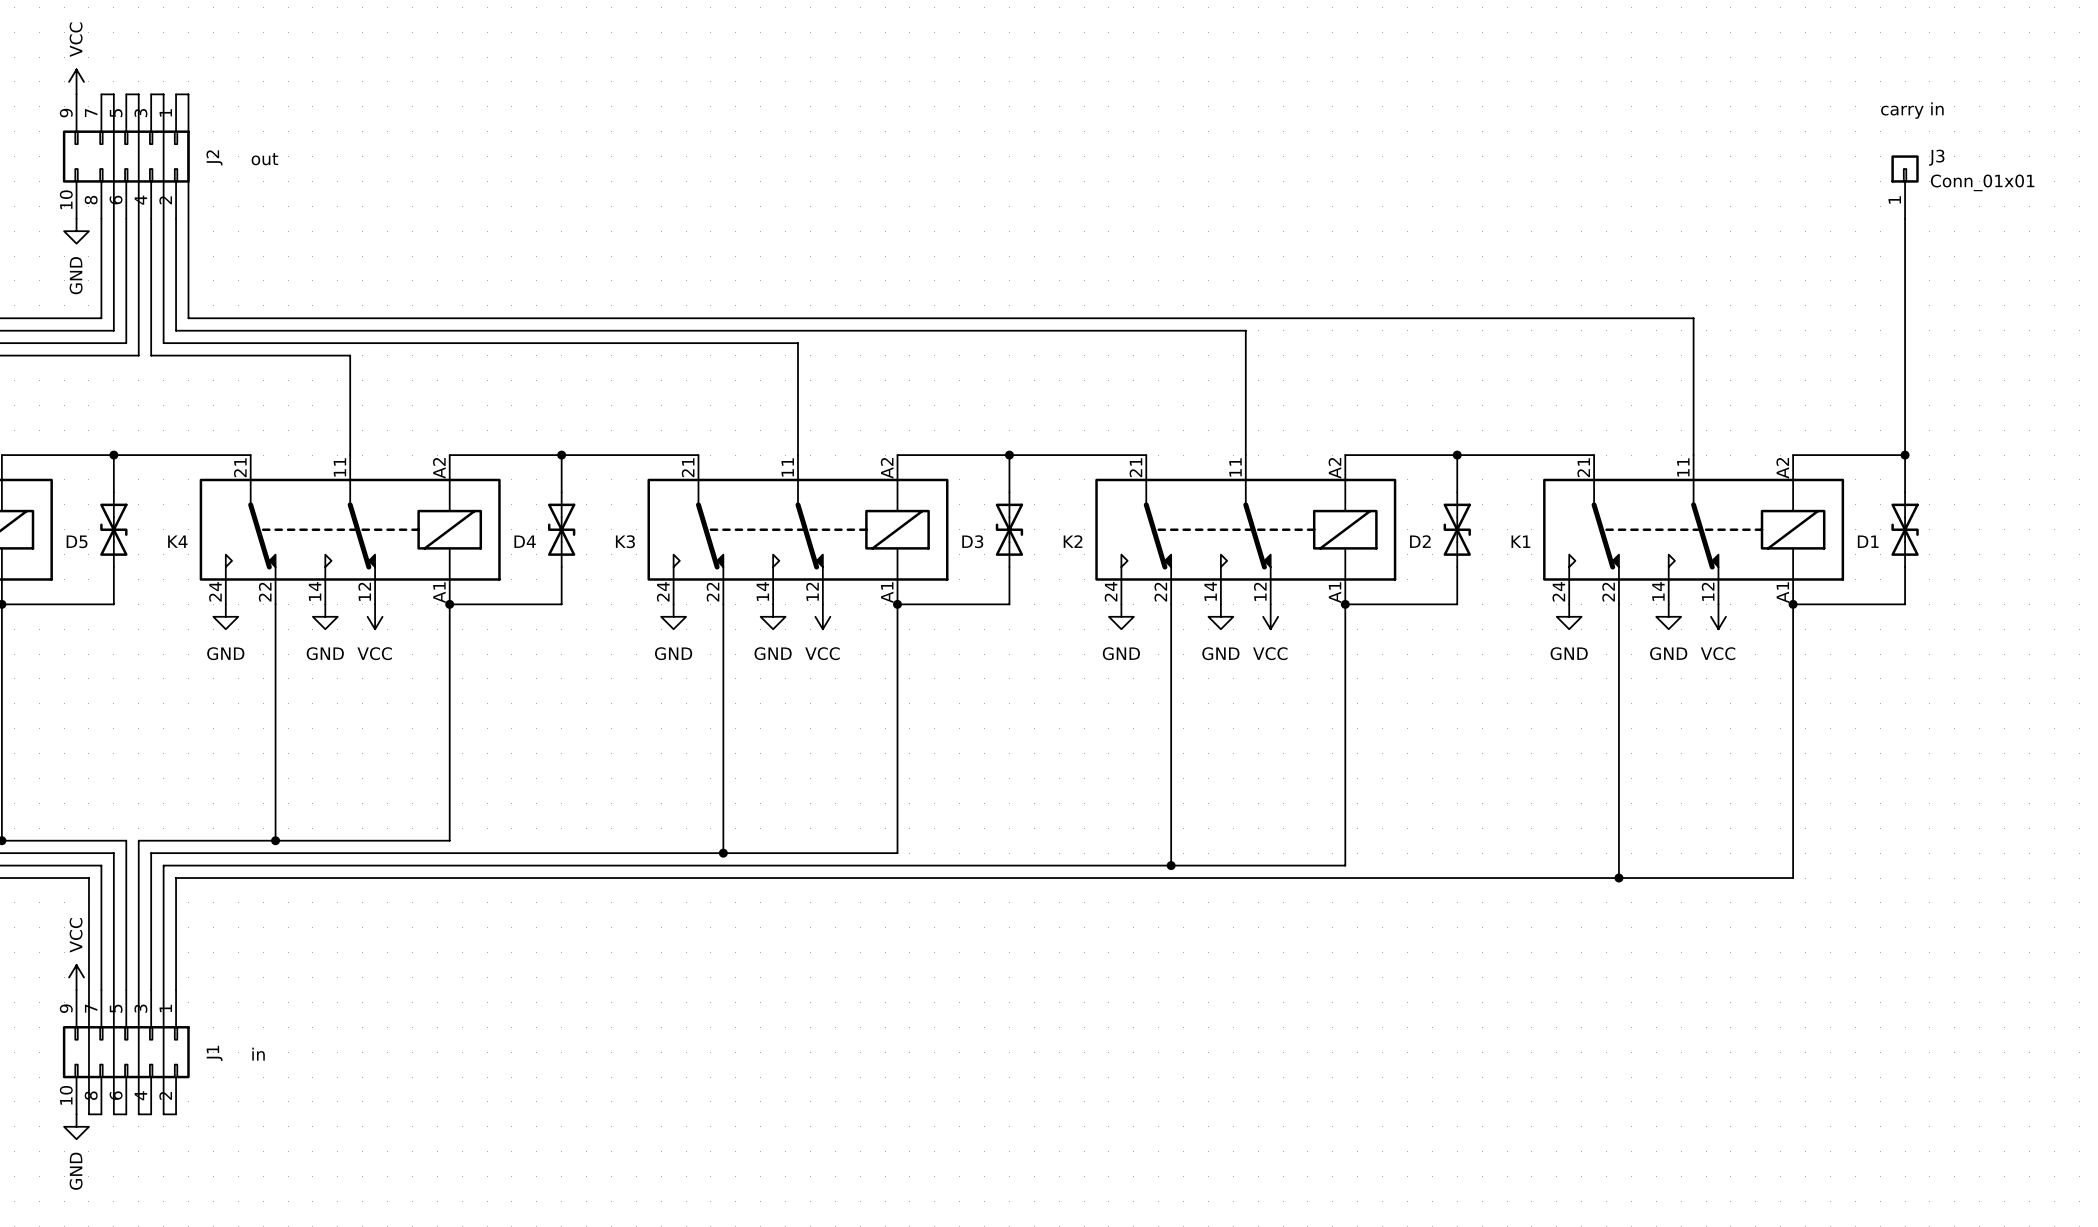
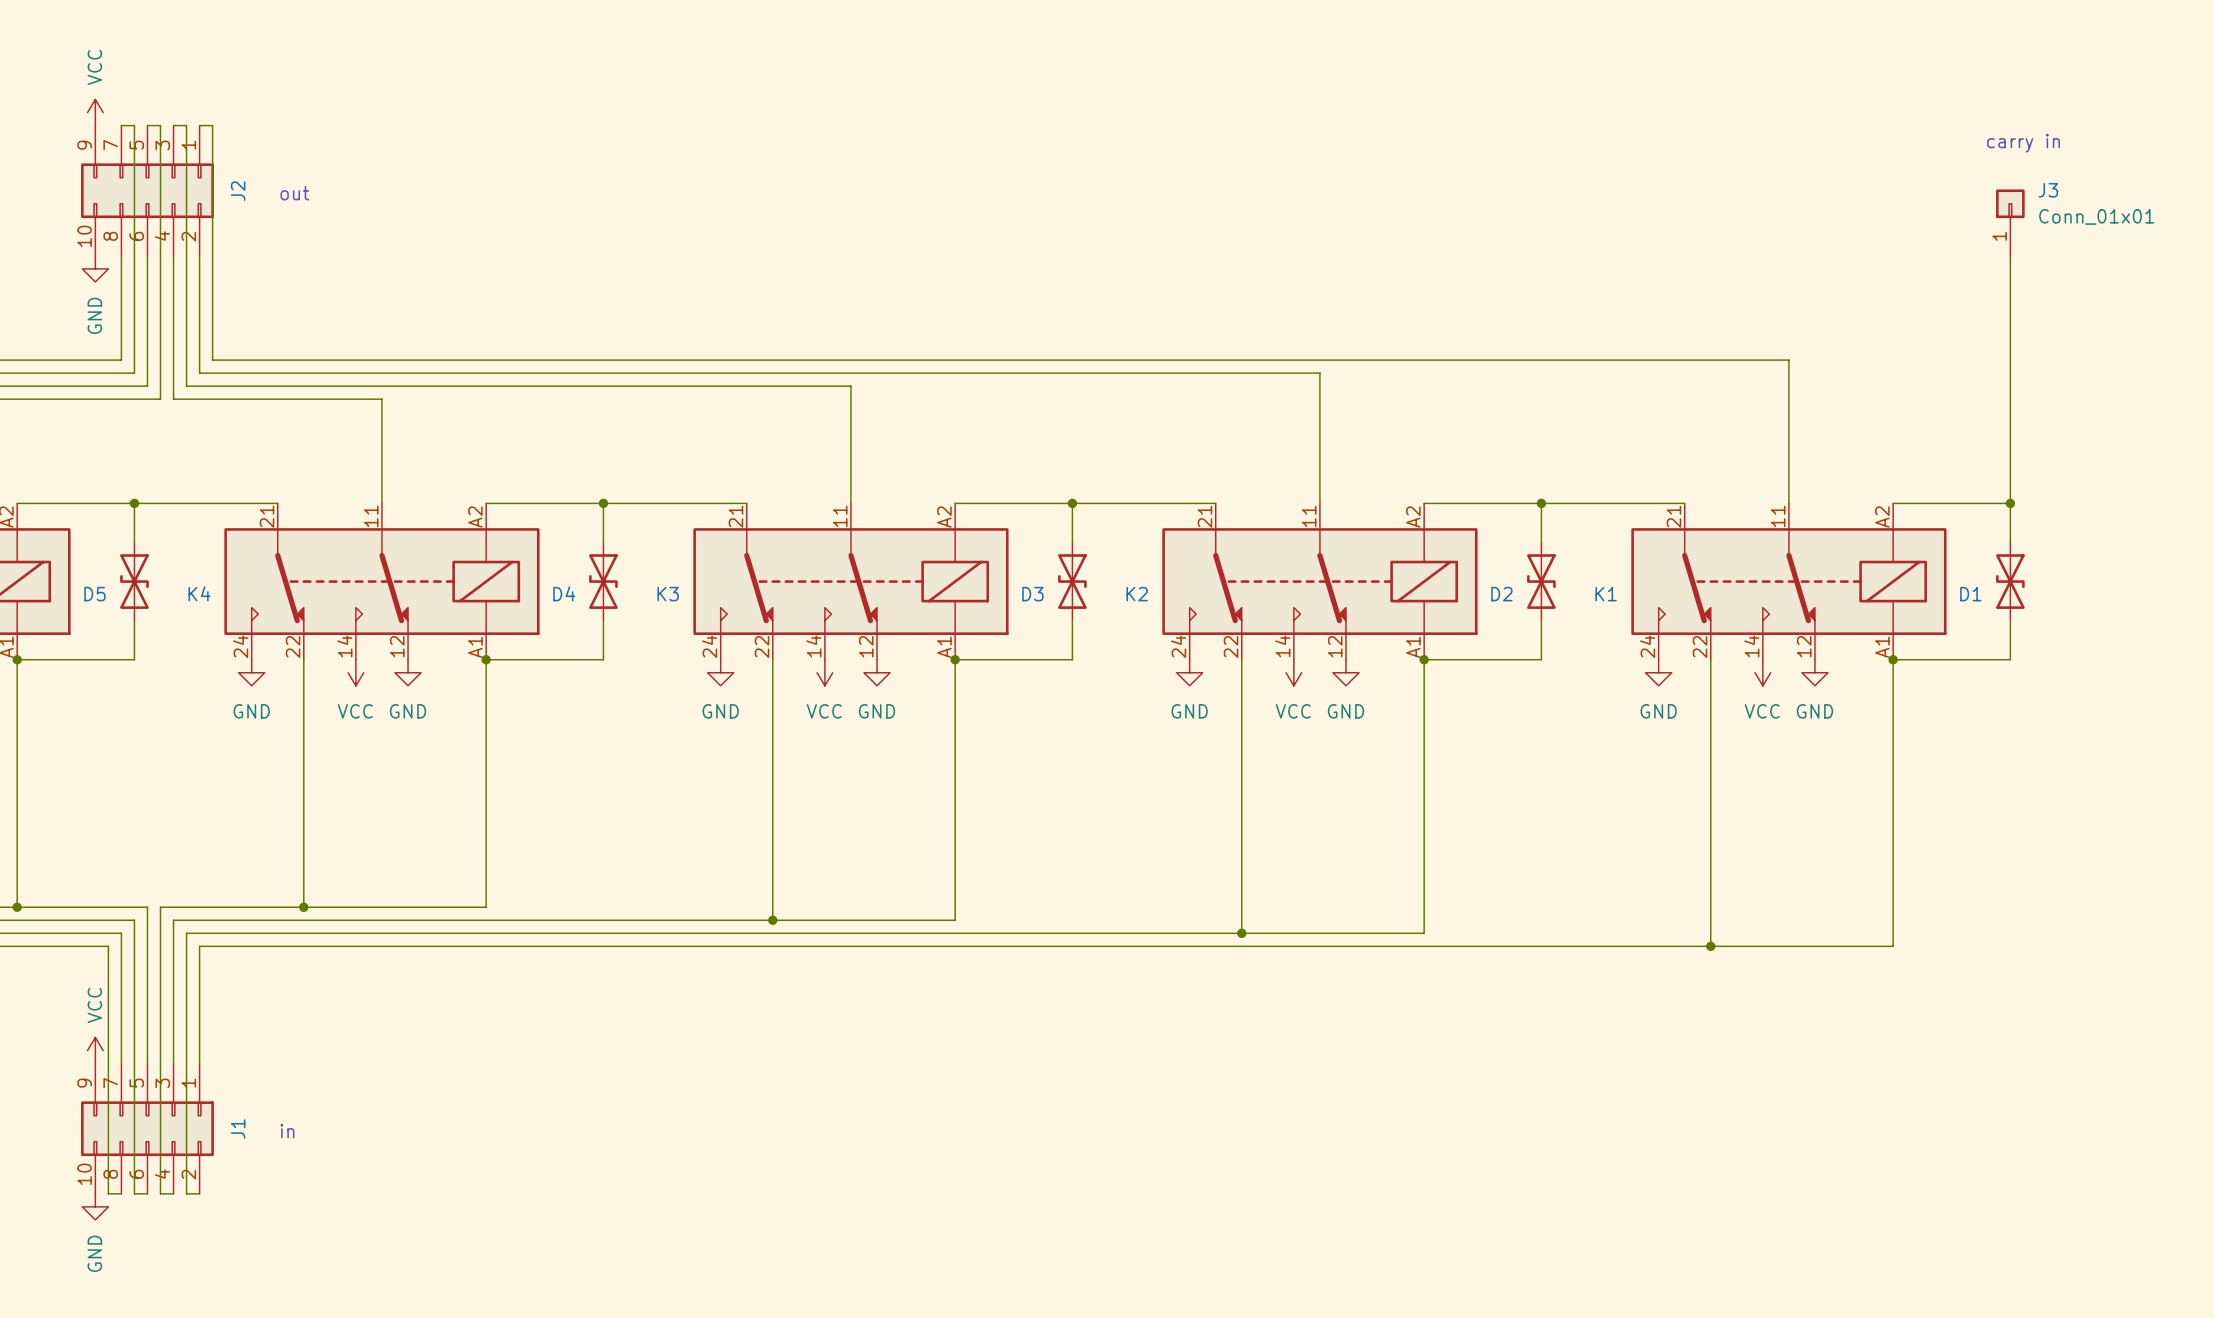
power symbol: GND (325, 616) -> VCC (355, 672)
power symbol: VCC (375, 616) -> GND (408, 672)
power symbol: GND (773, 616) -> VCC (824, 672)
power symbol: VCC (822, 616) -> GND (877, 672)
power symbol: GND (1220, 616) -> VCC (1293, 672)
power symbol: VCC (1270, 616) -> GND (1345, 672)
power symbol: GND (1668, 616) -> VCC (1762, 672)
power symbol: VCC (1718, 616) -> GND (1814, 672)

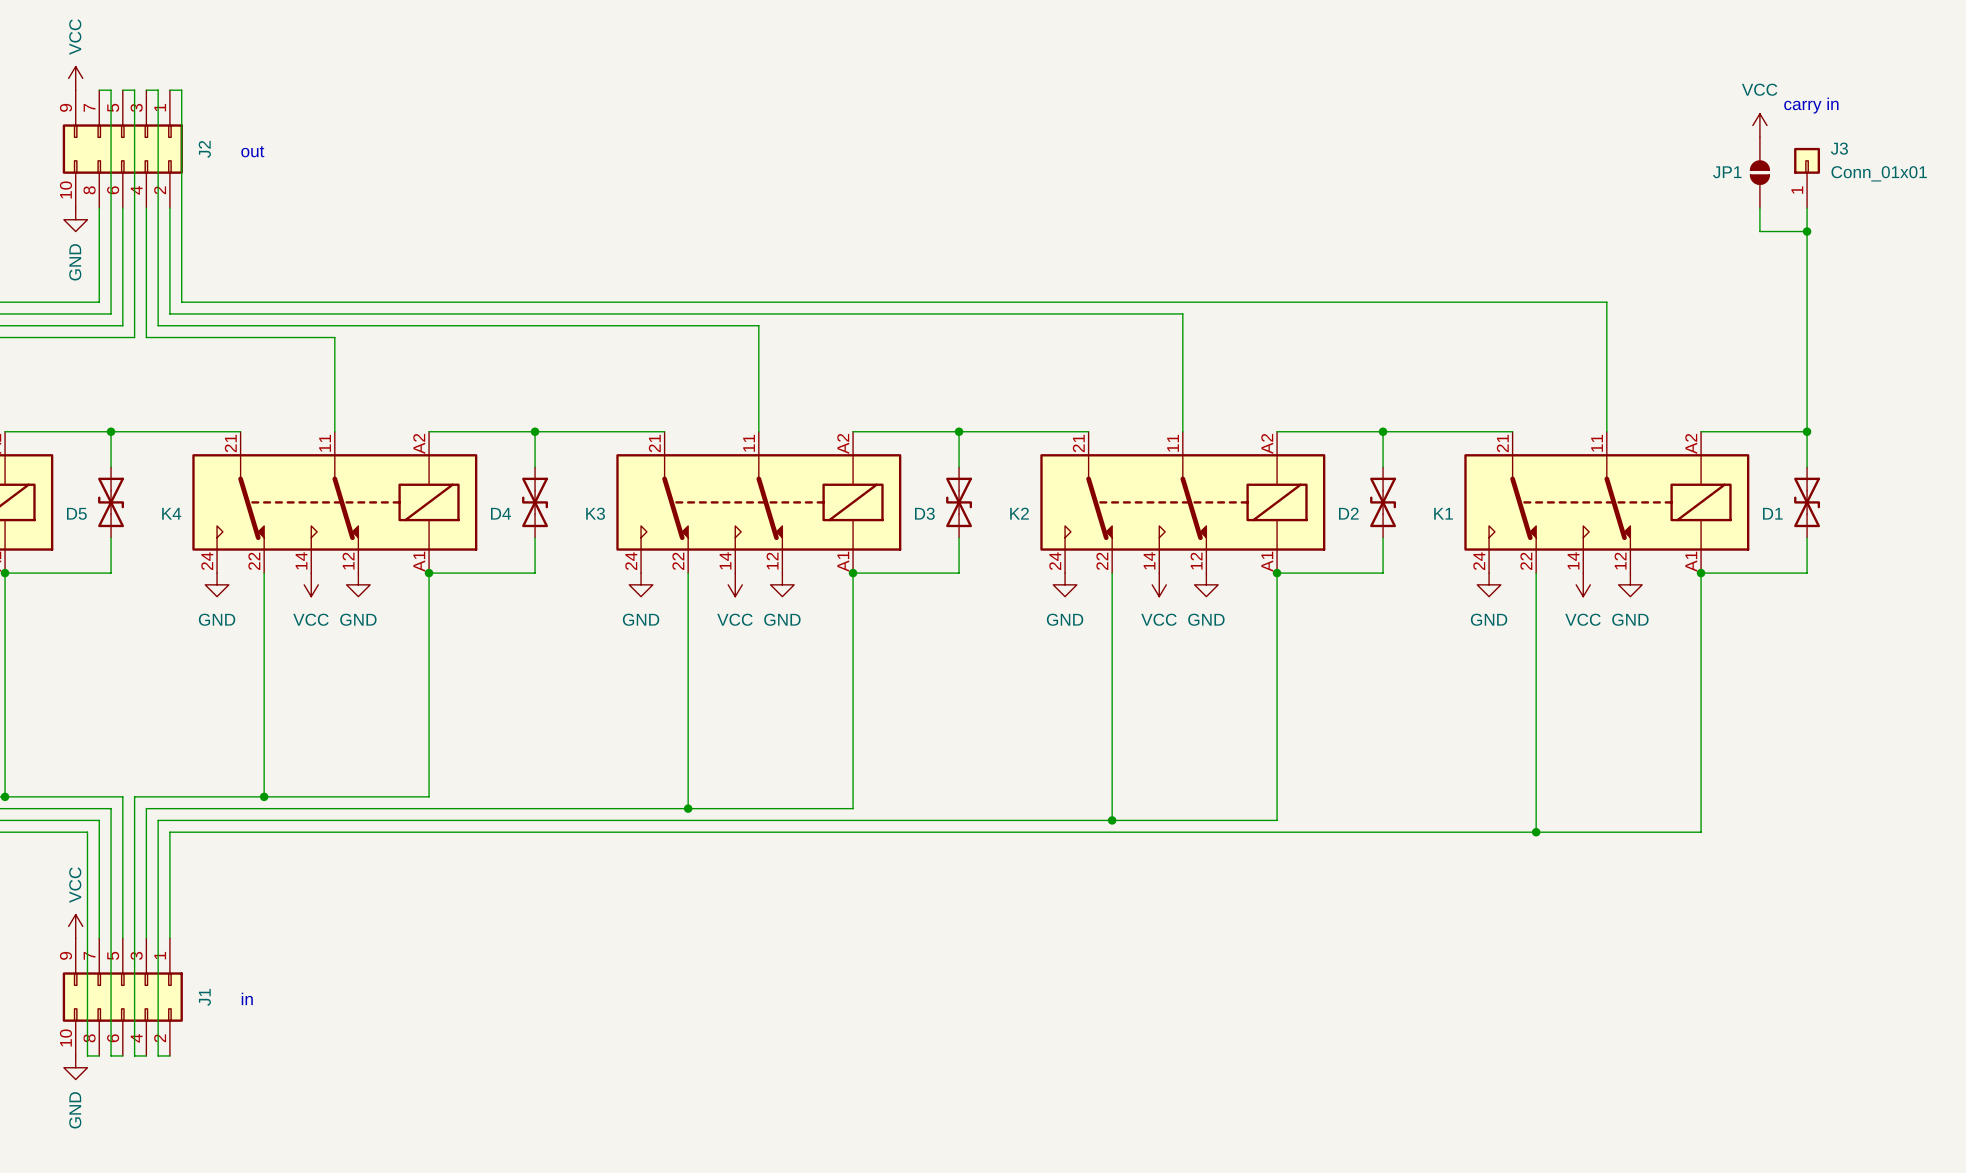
power symbol: none -> VCC (1759, 125)
JP1: none -> (1759, 172)
wire: none -> (1759, 207) (1759, 231) (1807, 231)
junction: none -> (1807, 231)

